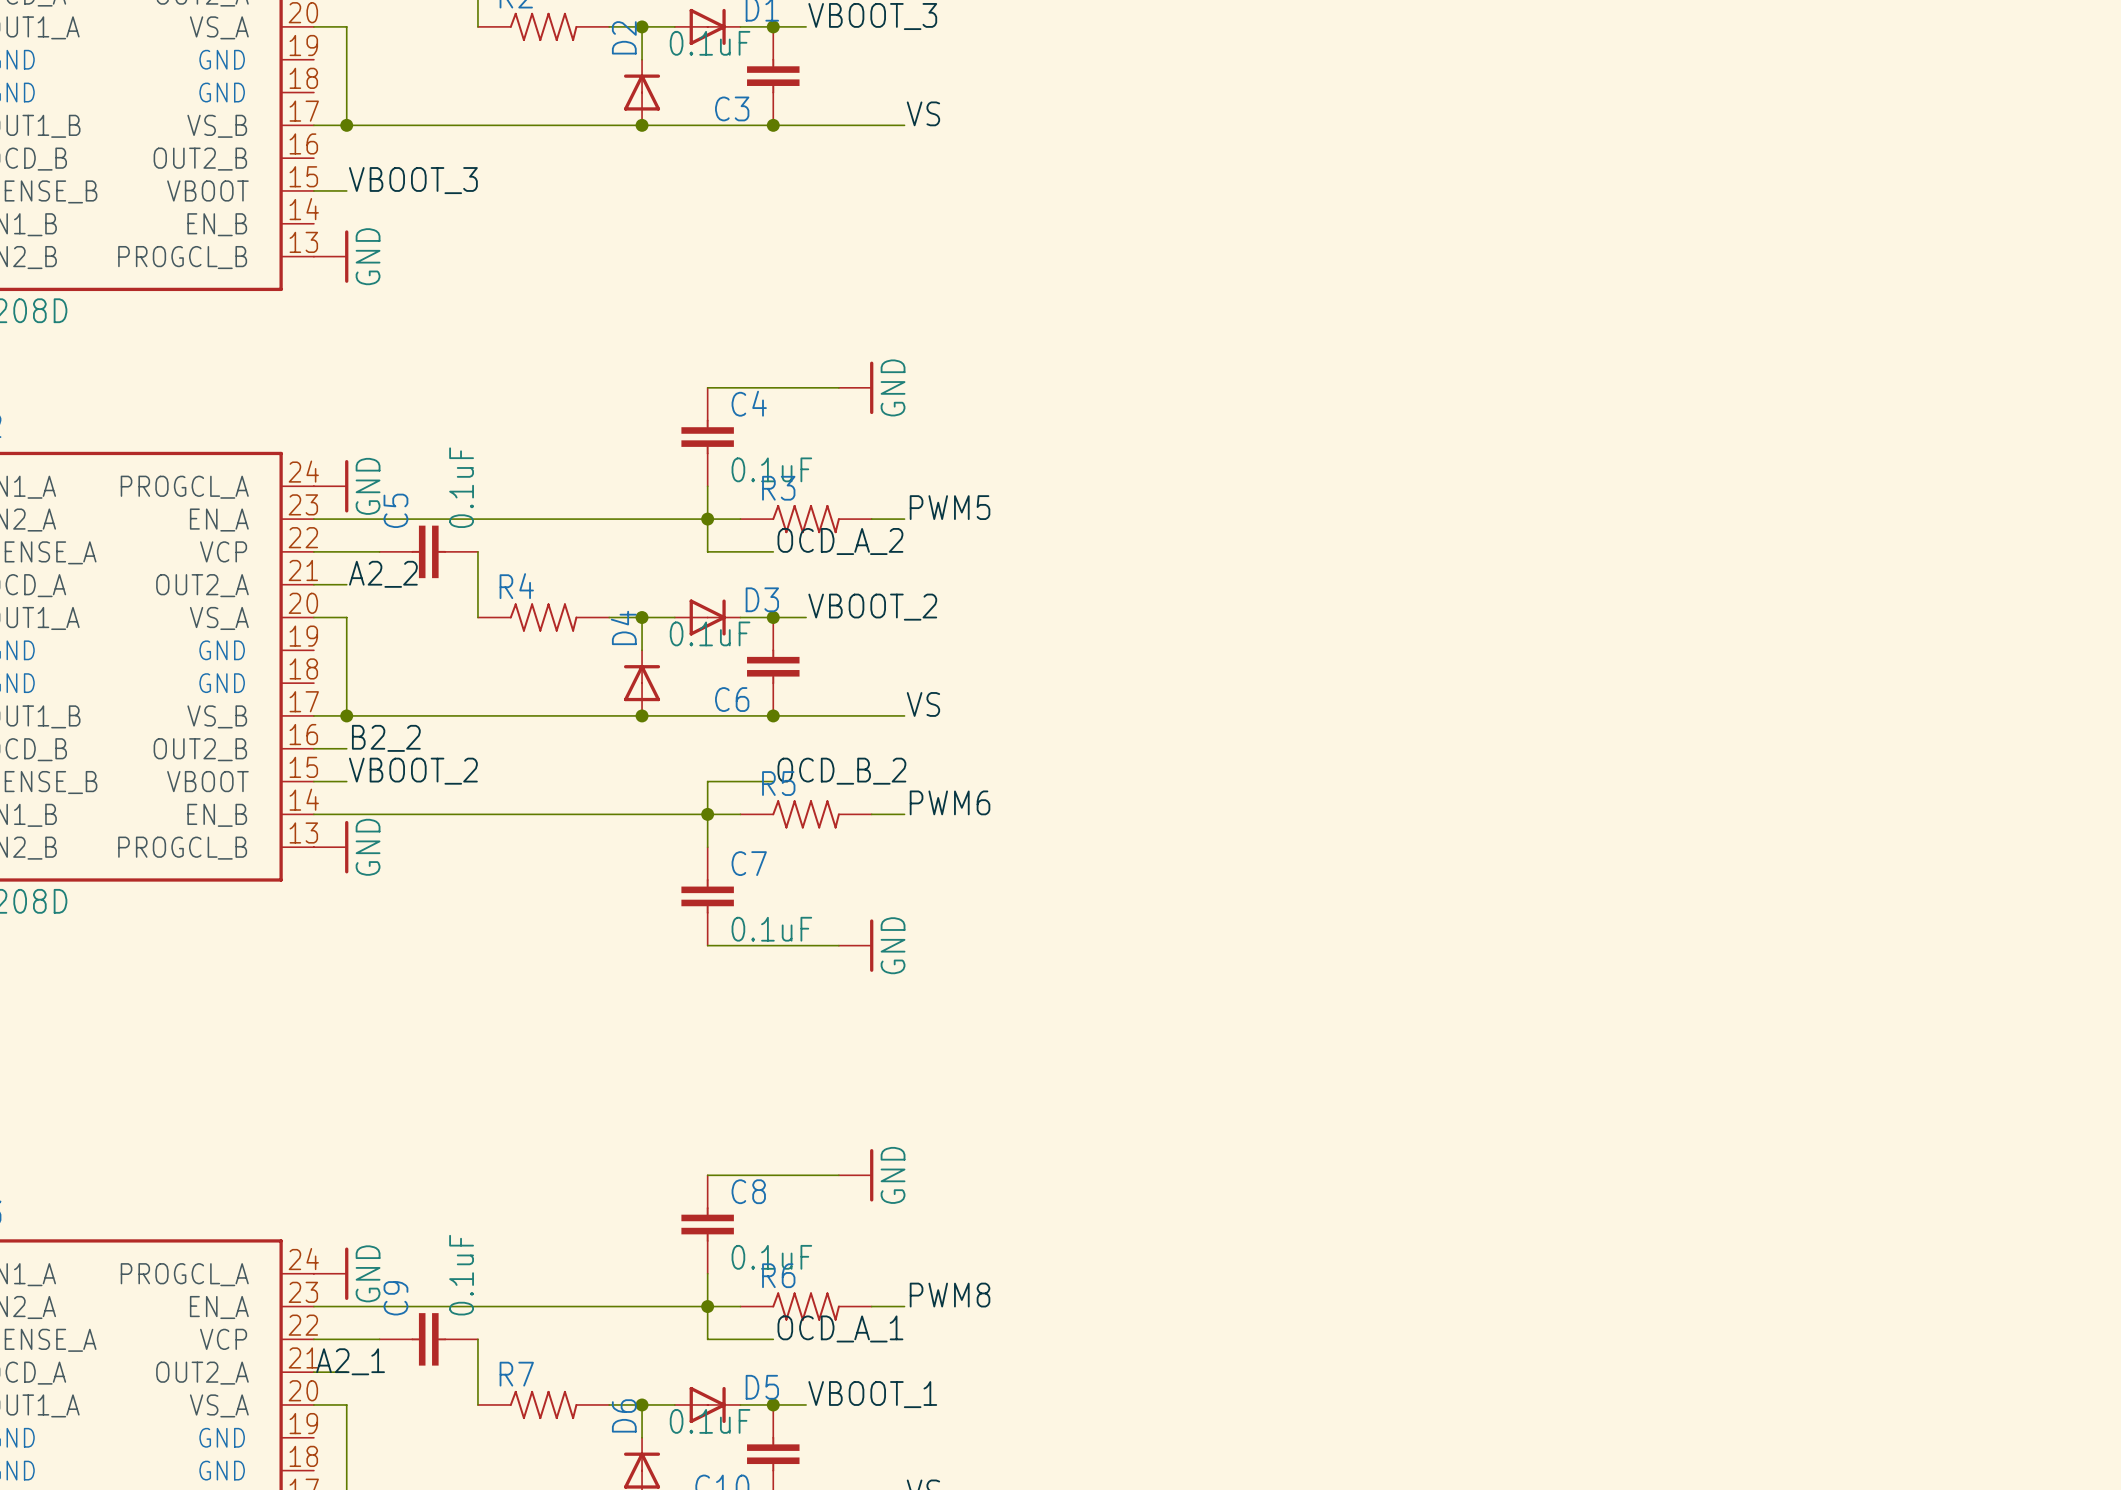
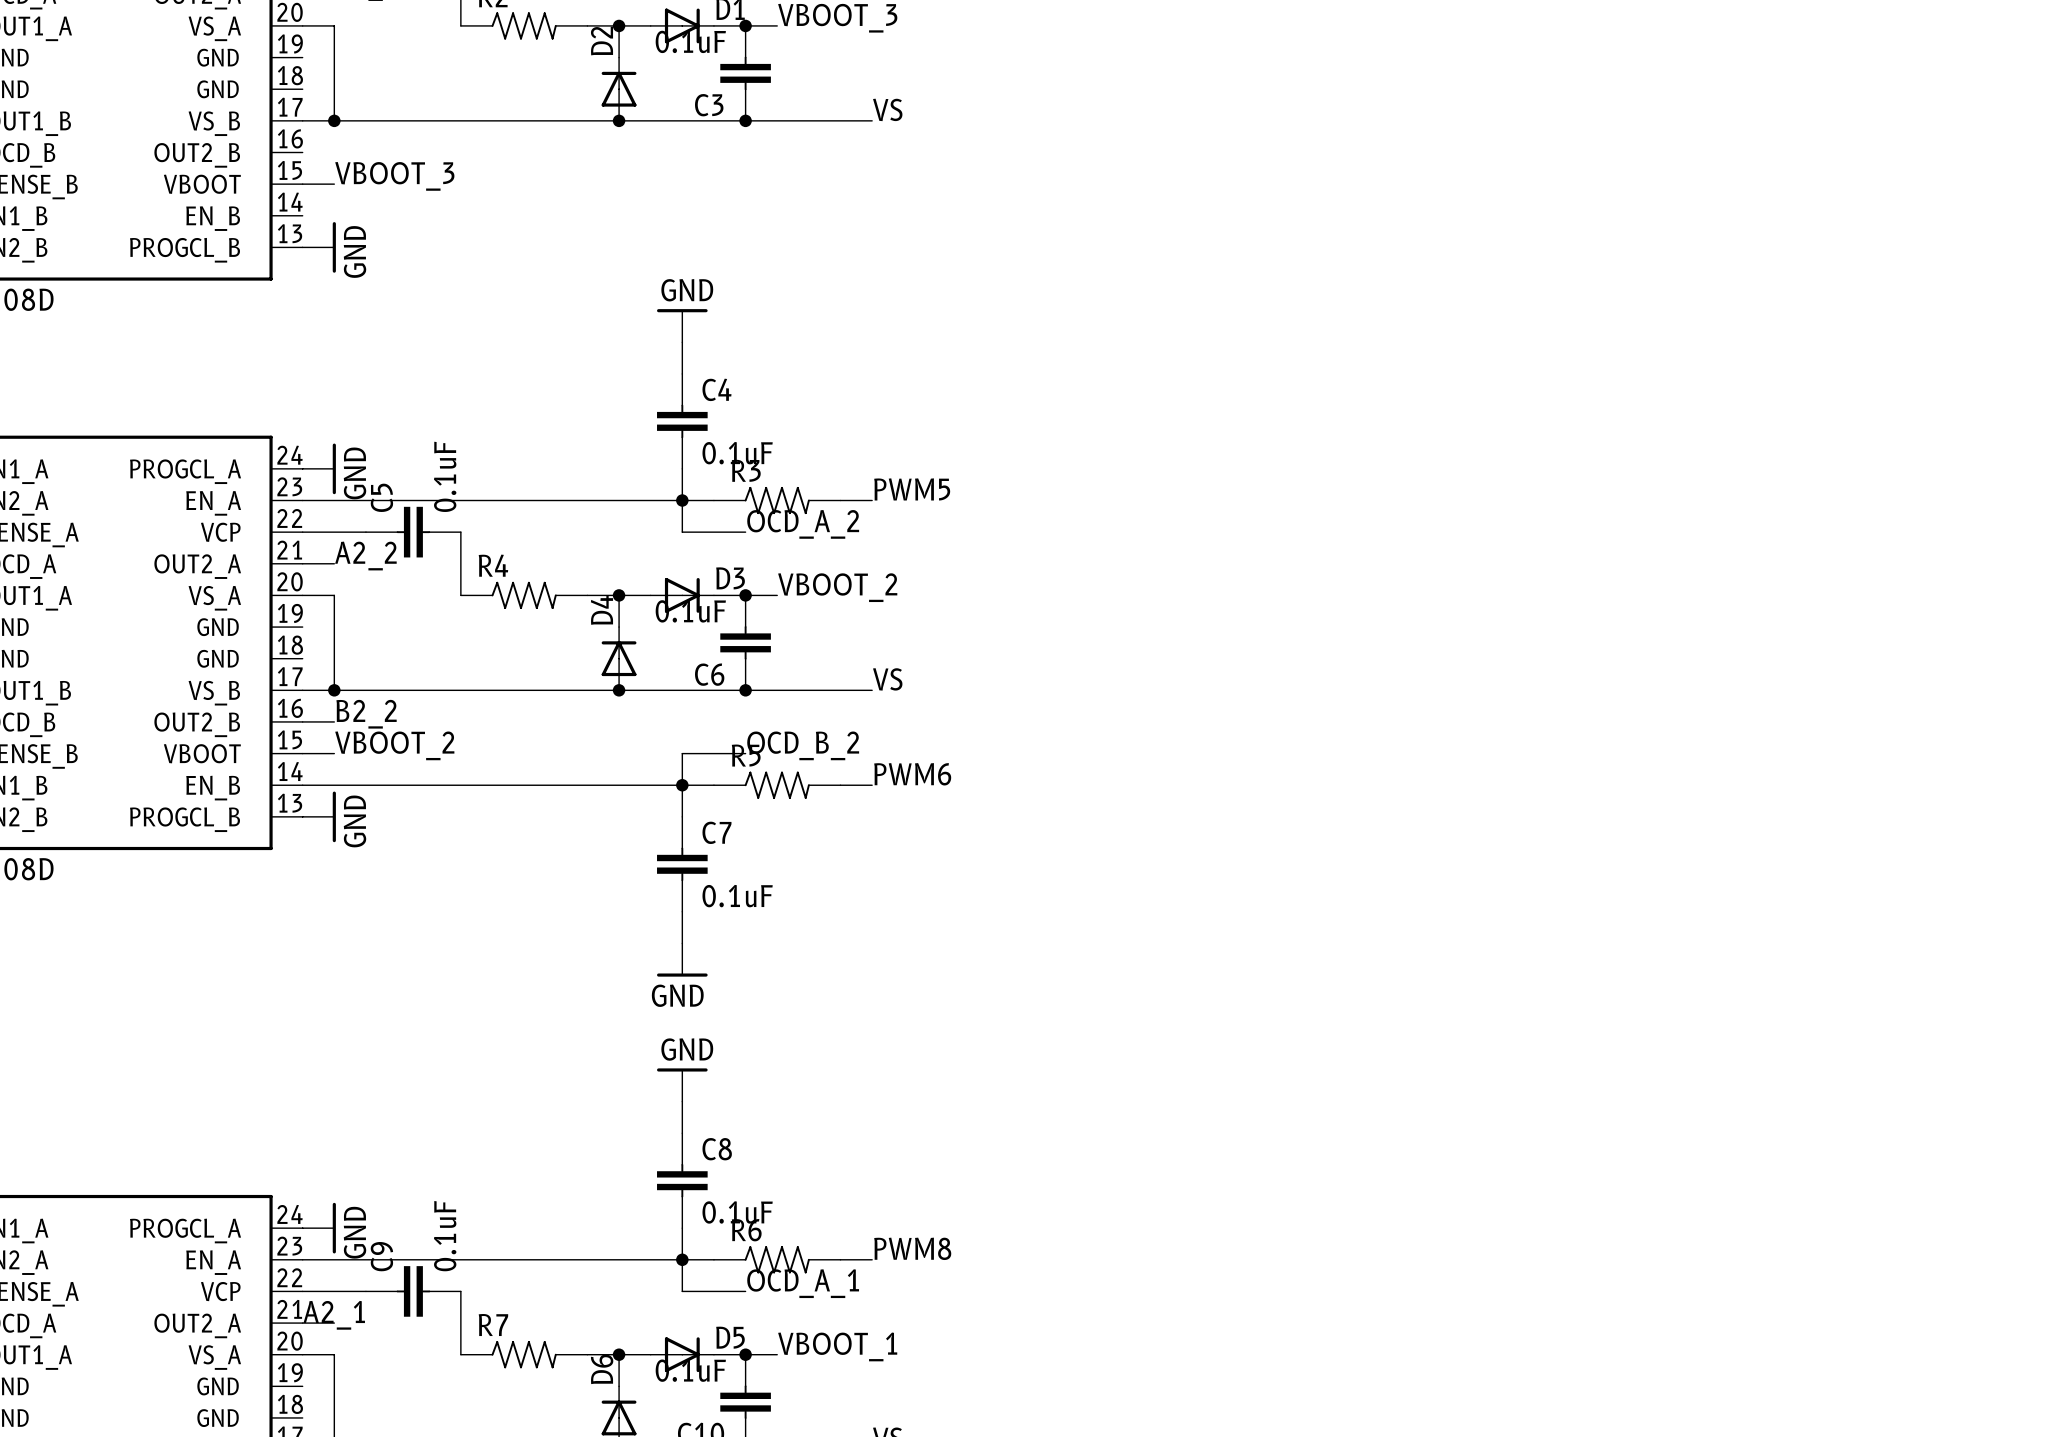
wire: (707, 387) (838, 387) -> (682, 373) (682, 342)
power symbol position: GND (856, 387) -> GND (682, 325)
power symbol rotation: 0° (871, 387) -> 90° counterclockwise (682, 310)
wire: (707, 945) (838, 945) -> (682, 911) (682, 943)
power symbol: GND (856, 945) -> none
power symbol: none -> GND (682, 960)
power symbol: none -> GND (682, 1084)
wire: (707, 1175) (838, 1175) -> (682, 1133) (682, 1101)
power symbol: GND (856, 1175) -> none

